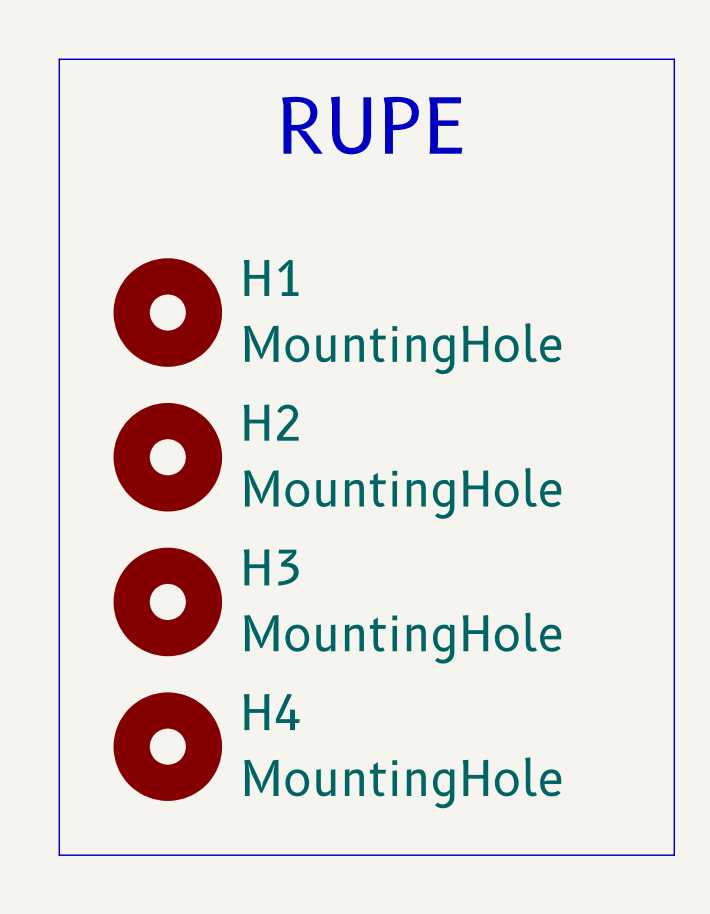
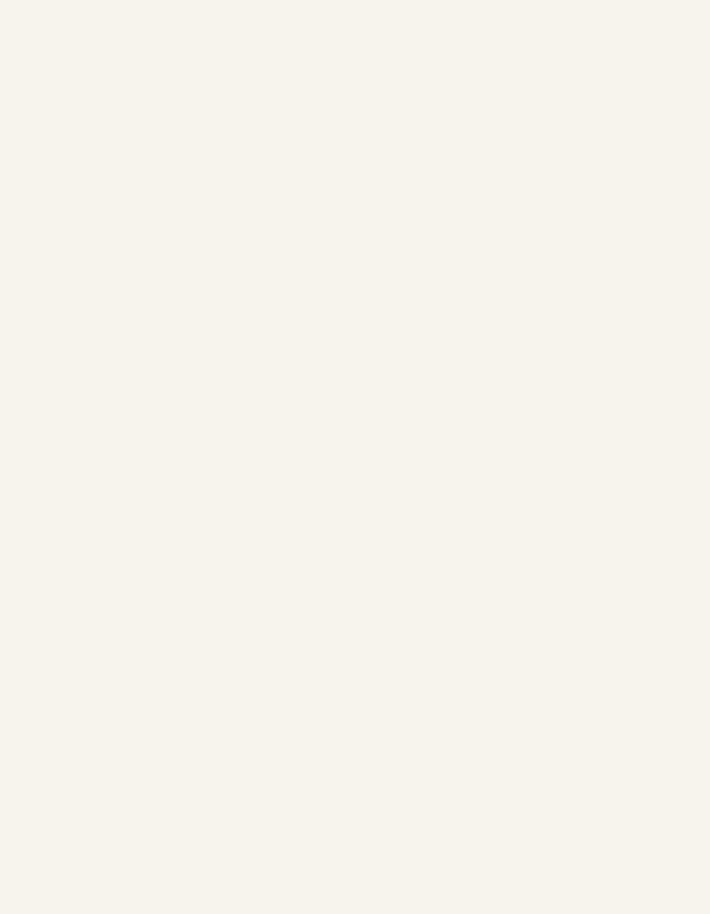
line: (59, 59) (674, 59) (674, 855) (59, 855) (59, 59) -> none
text: RUPE (372, 125) -> none
H1: MountingHole (167, 312) -> none
H2: MountingHole (167, 457) -> none
H3: MountingHole (167, 601) -> none
H4: MountingHole (167, 746) -> none

